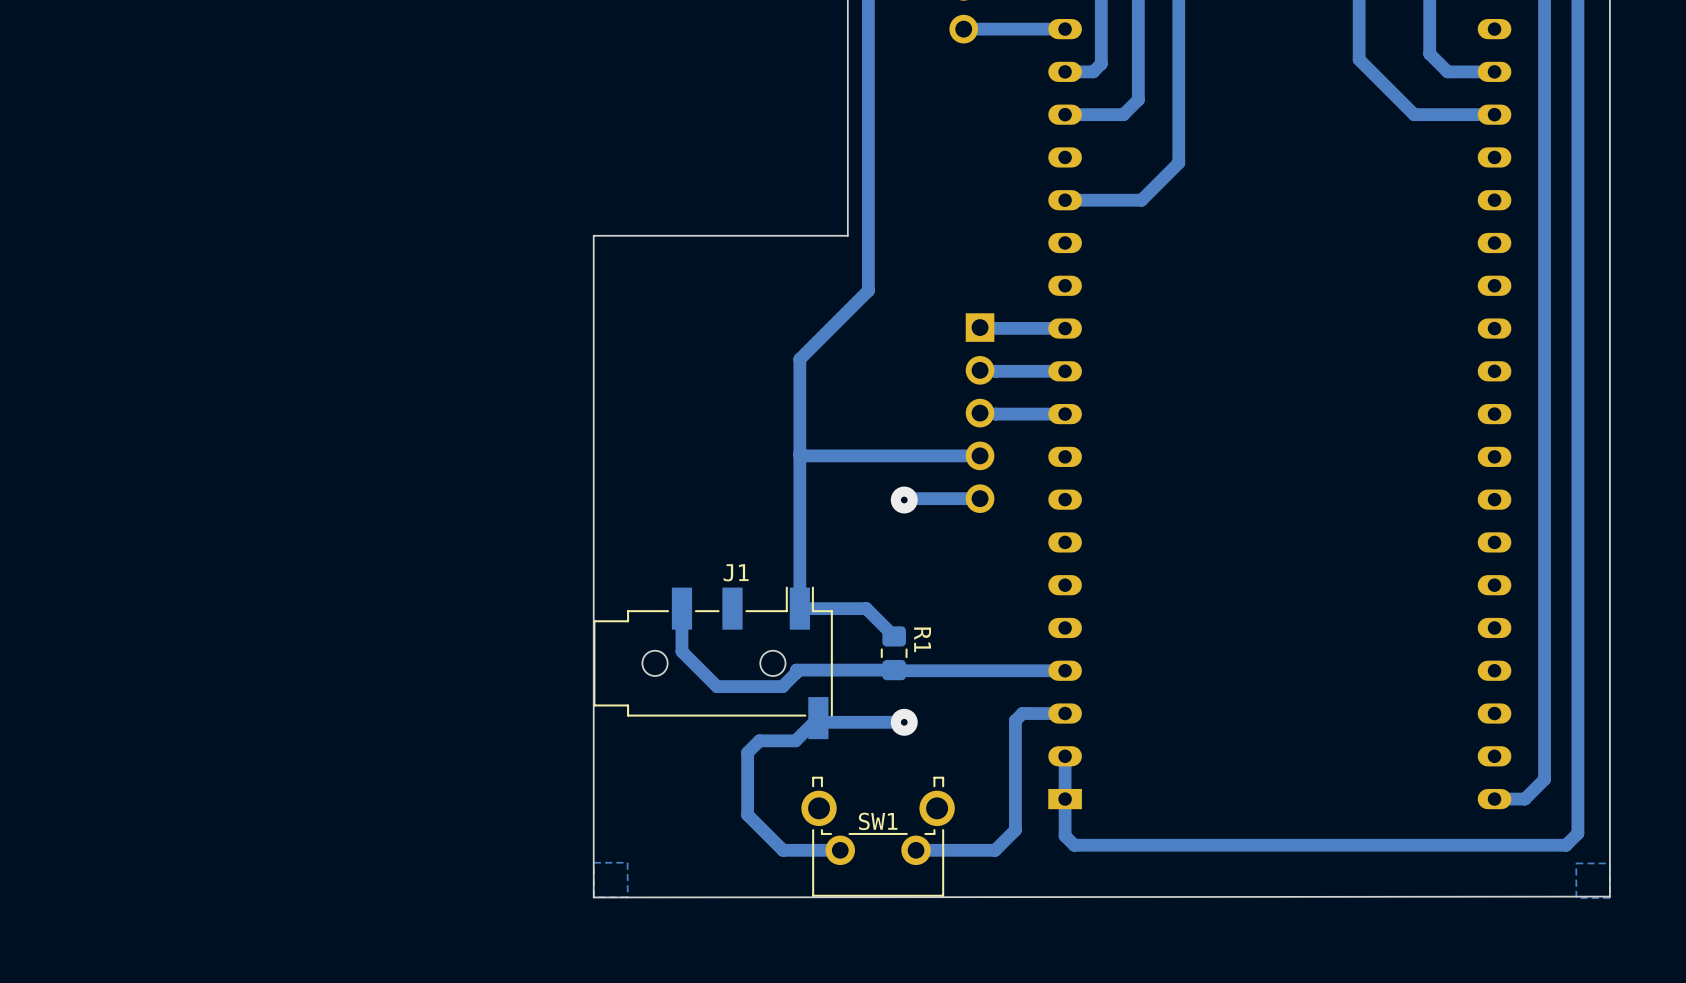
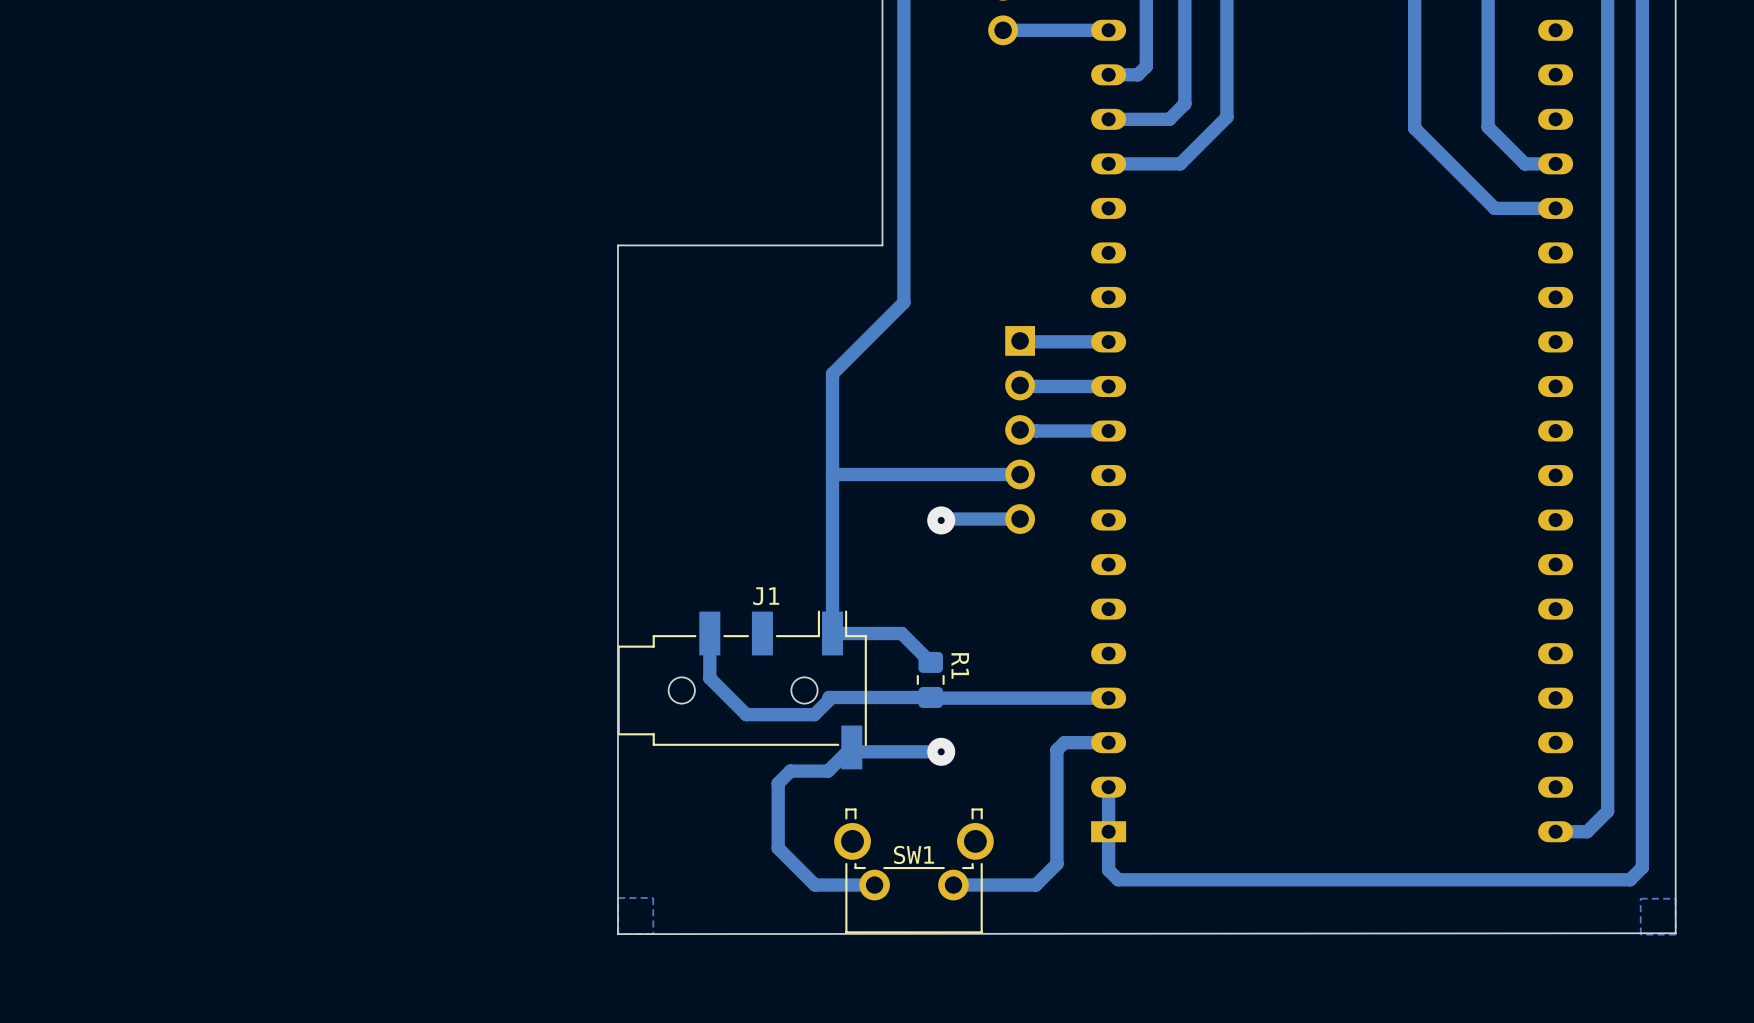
track: (1429, 53) (1447, 71) (1494, 71) -> (1488, 56) (1488, 127) (1524, 163) (1555, 163)
track: (1359, 59) (1414, 114) (1494, 114) -> (1414, 62) (1414, 128) (1494, 208) (1555, 208)
track: (1178, 112) (1178, 163) (1141, 200) (1065, 200) -> (1226, 117) (1180, 163) (1108, 163)

